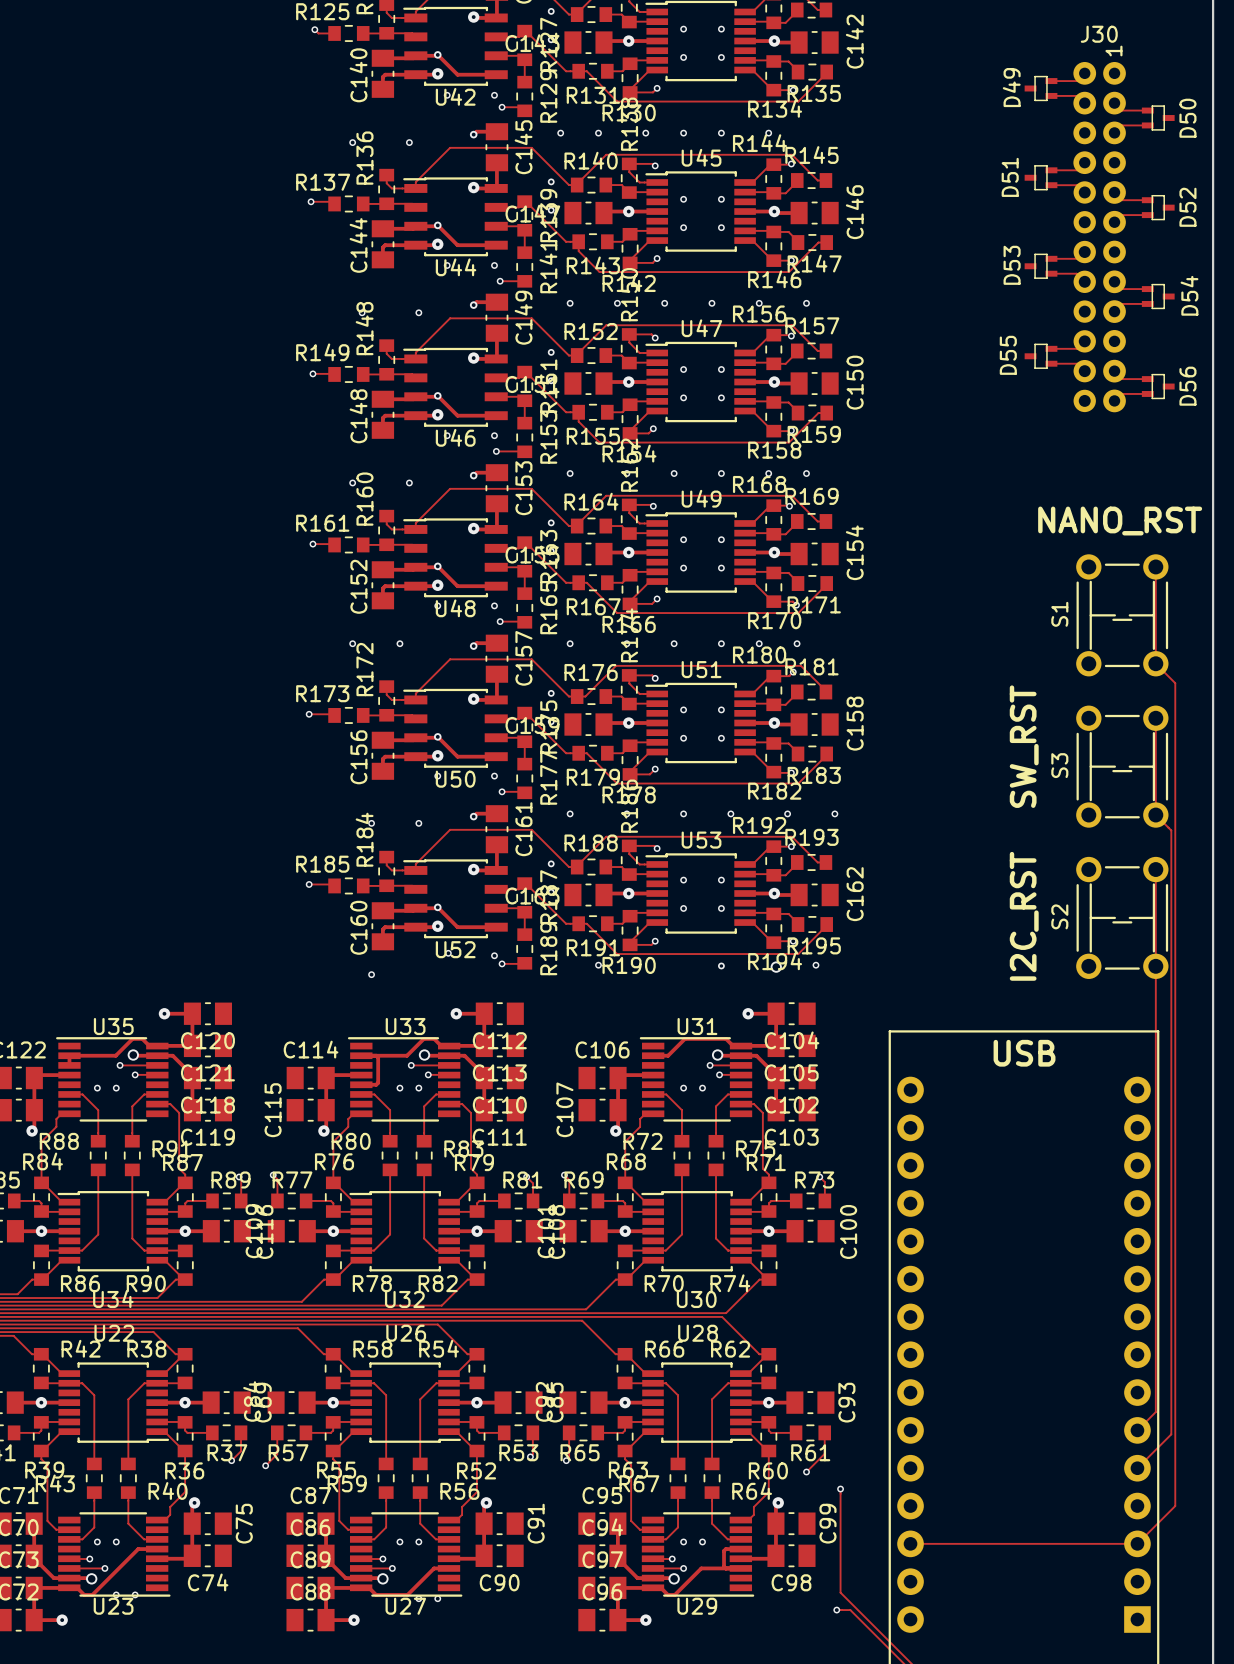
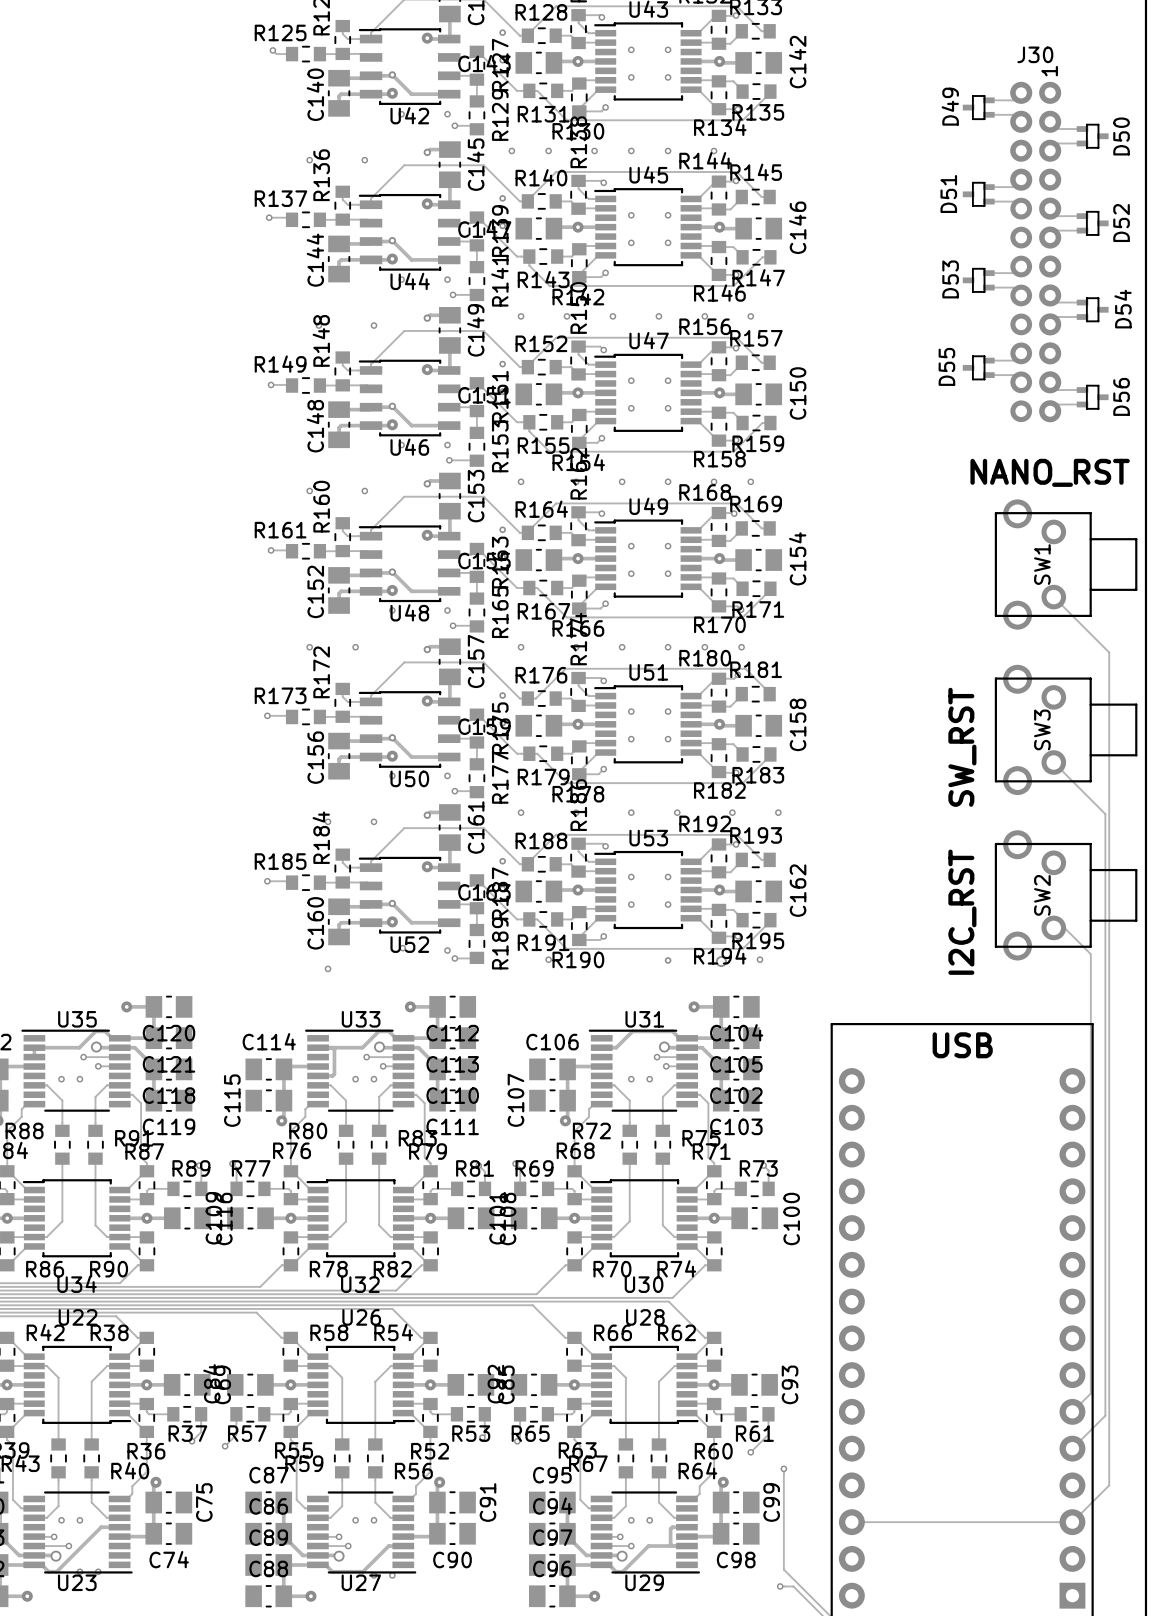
text position: NANO_RST (1120, 521) -> NANO_RST (1050, 472)
SW1: none -> (1066, 564)
track: (1155, 566) (1155, 663) (1175, 683) -> (1053, 597) (1109, 652) (1109, 685)
S1: (1122, 615) -> none
track: (1155, 718) (1155, 815) (1171, 830) -> (1053, 762) (1105, 814) (1105, 828)
SW3: none -> (1066, 729)
S3: (1122, 766) -> none
track: (1155, 869) (1155, 1412) -> (1090, 954) (1090, 1394)
SW2: none -> (1066, 895)
S2: (1122, 917) -> none
track: none -> (1053, 927) (1064, 927) (1090, 953)

